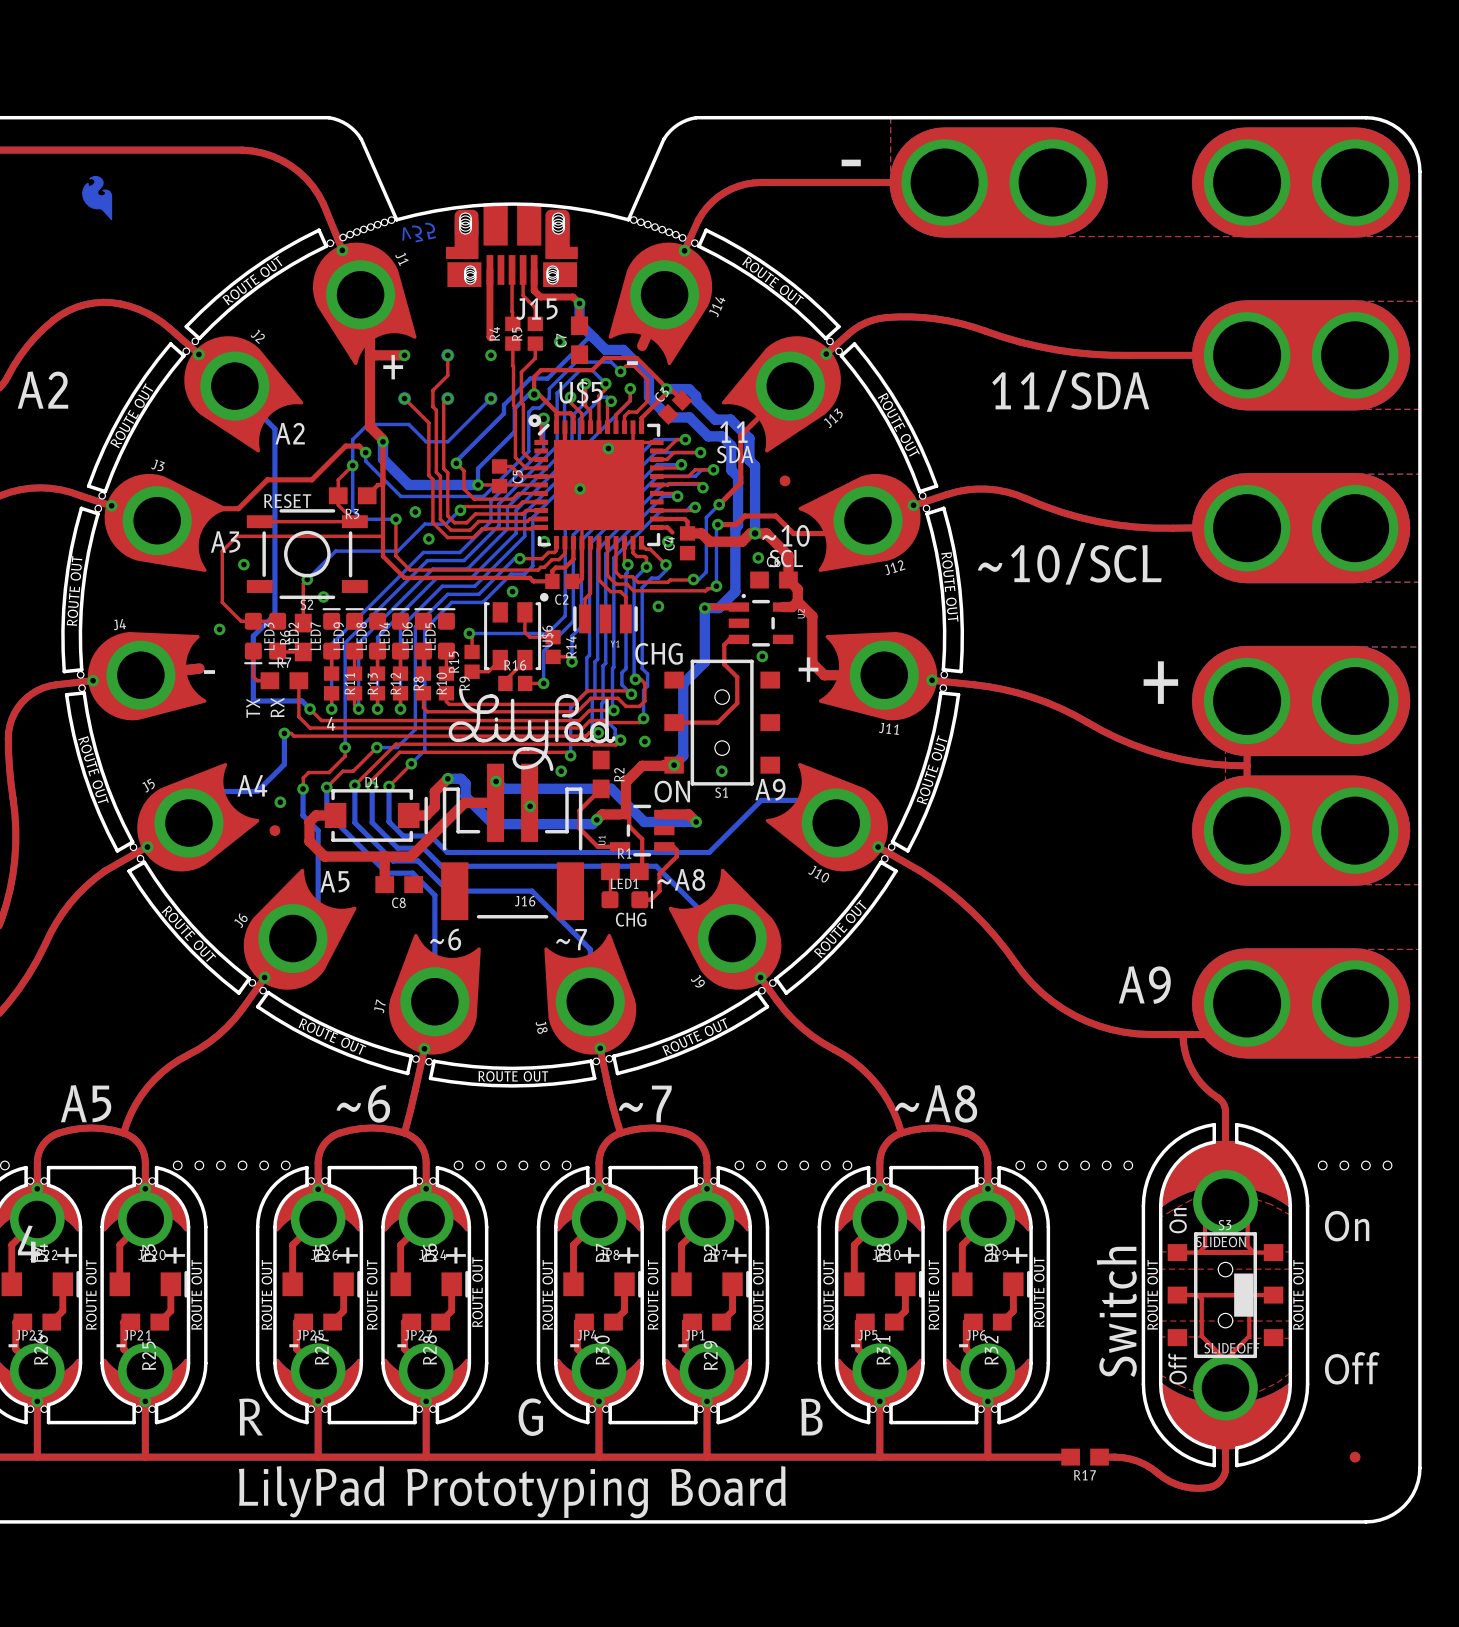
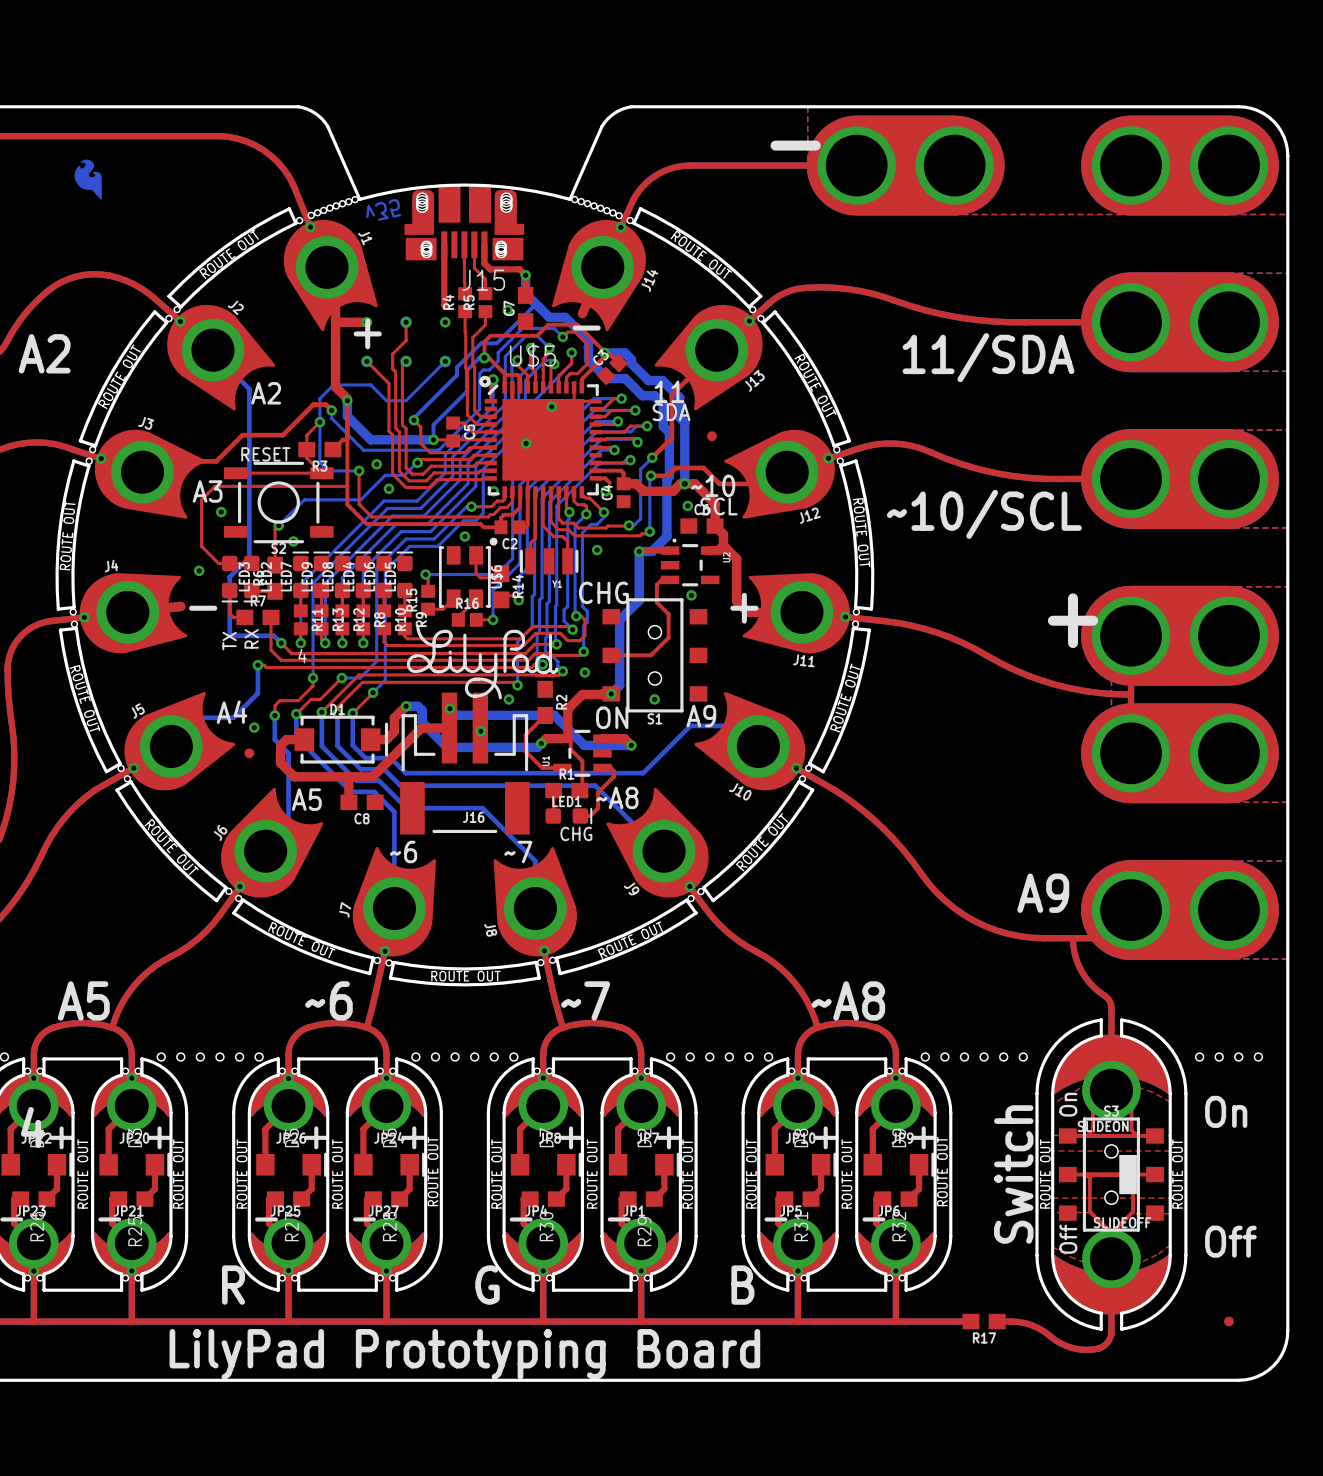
R14 footprint: [545, 629, 561, 665] -> [493, 565, 510, 609]

